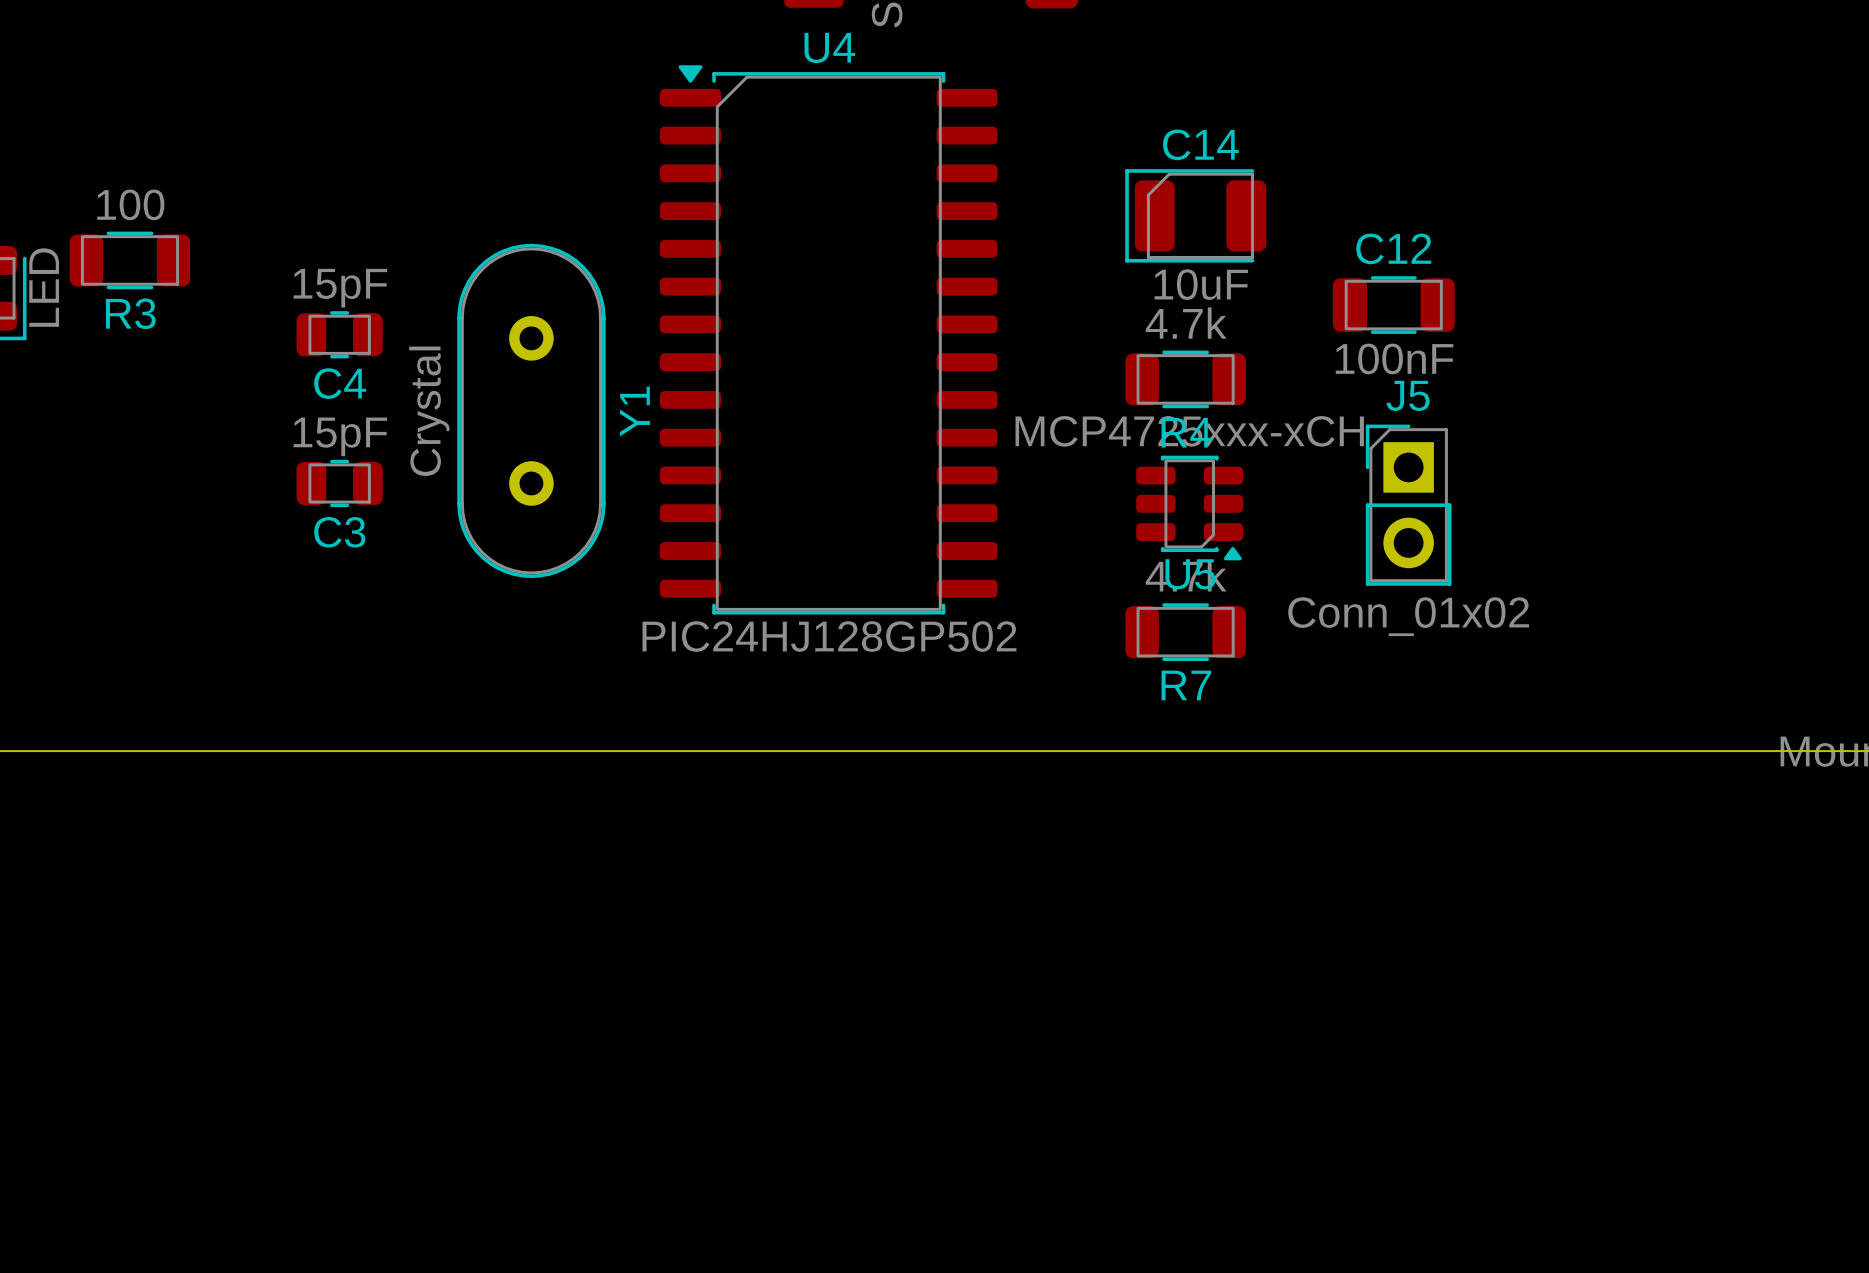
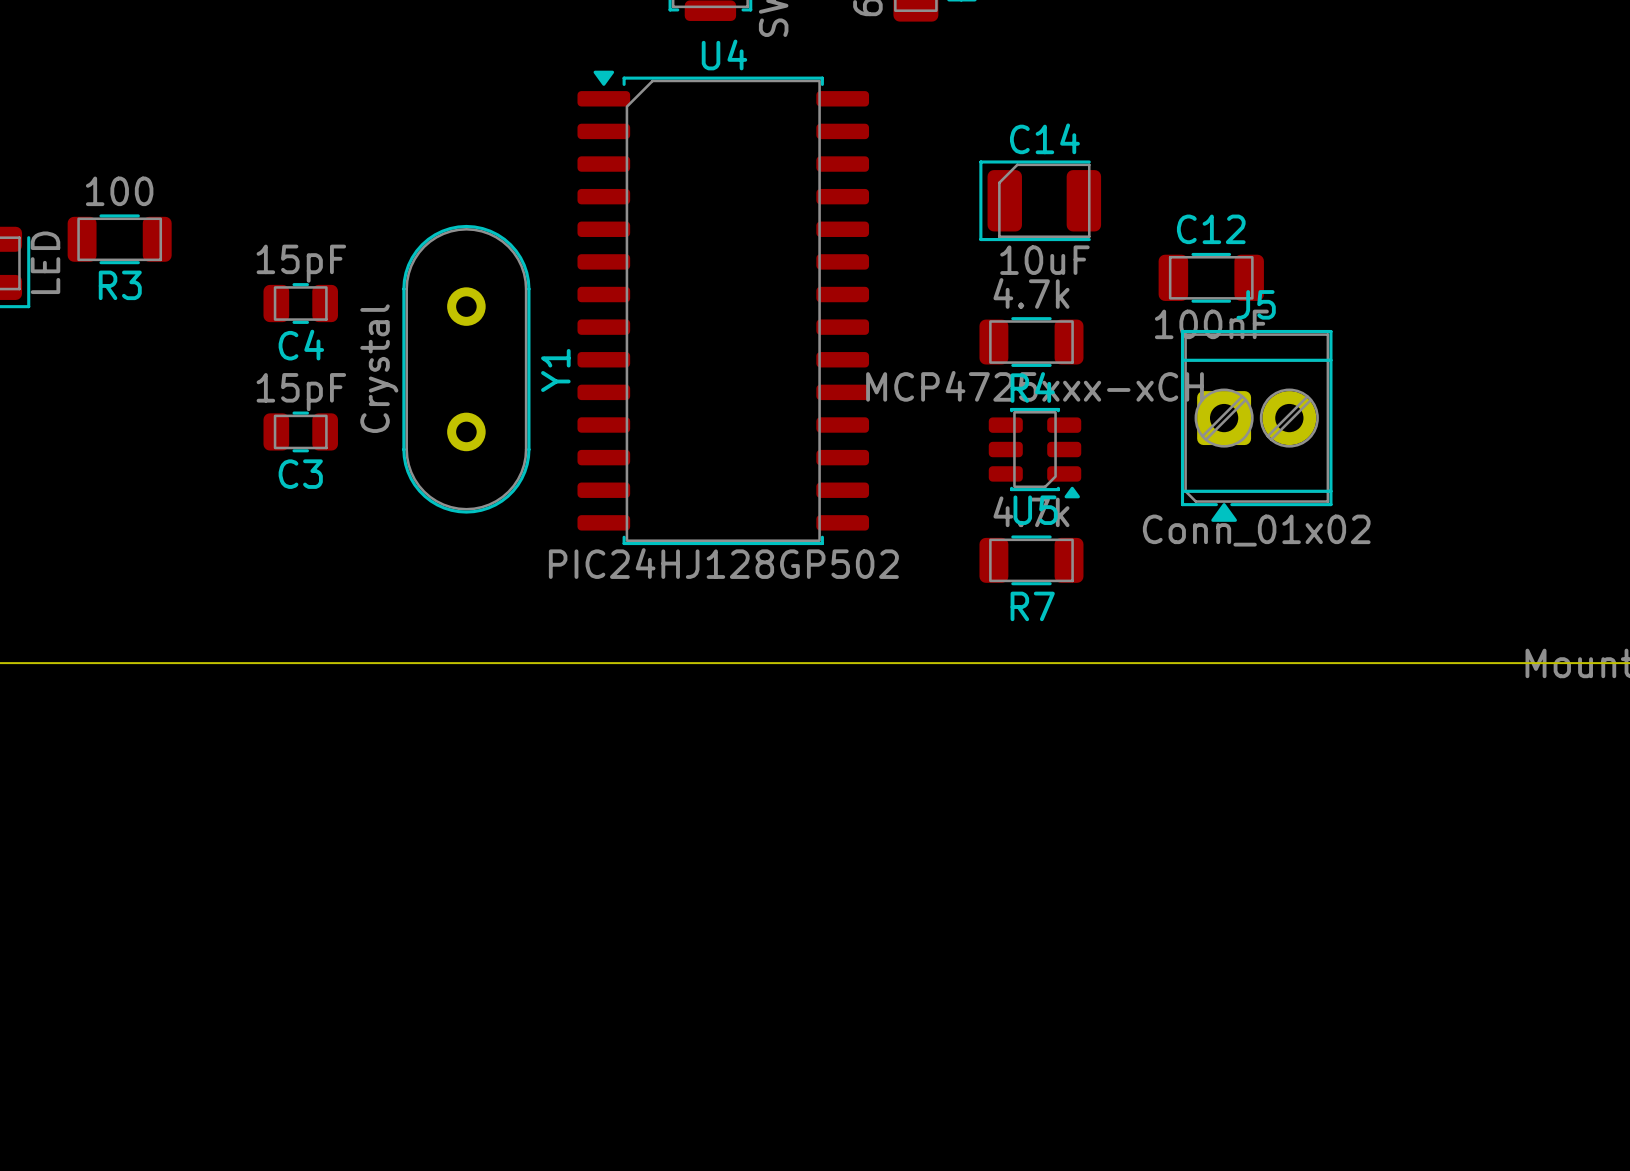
J5 footprint: [1365, 424, 1452, 586] -> [1180, 329, 1333, 522]

